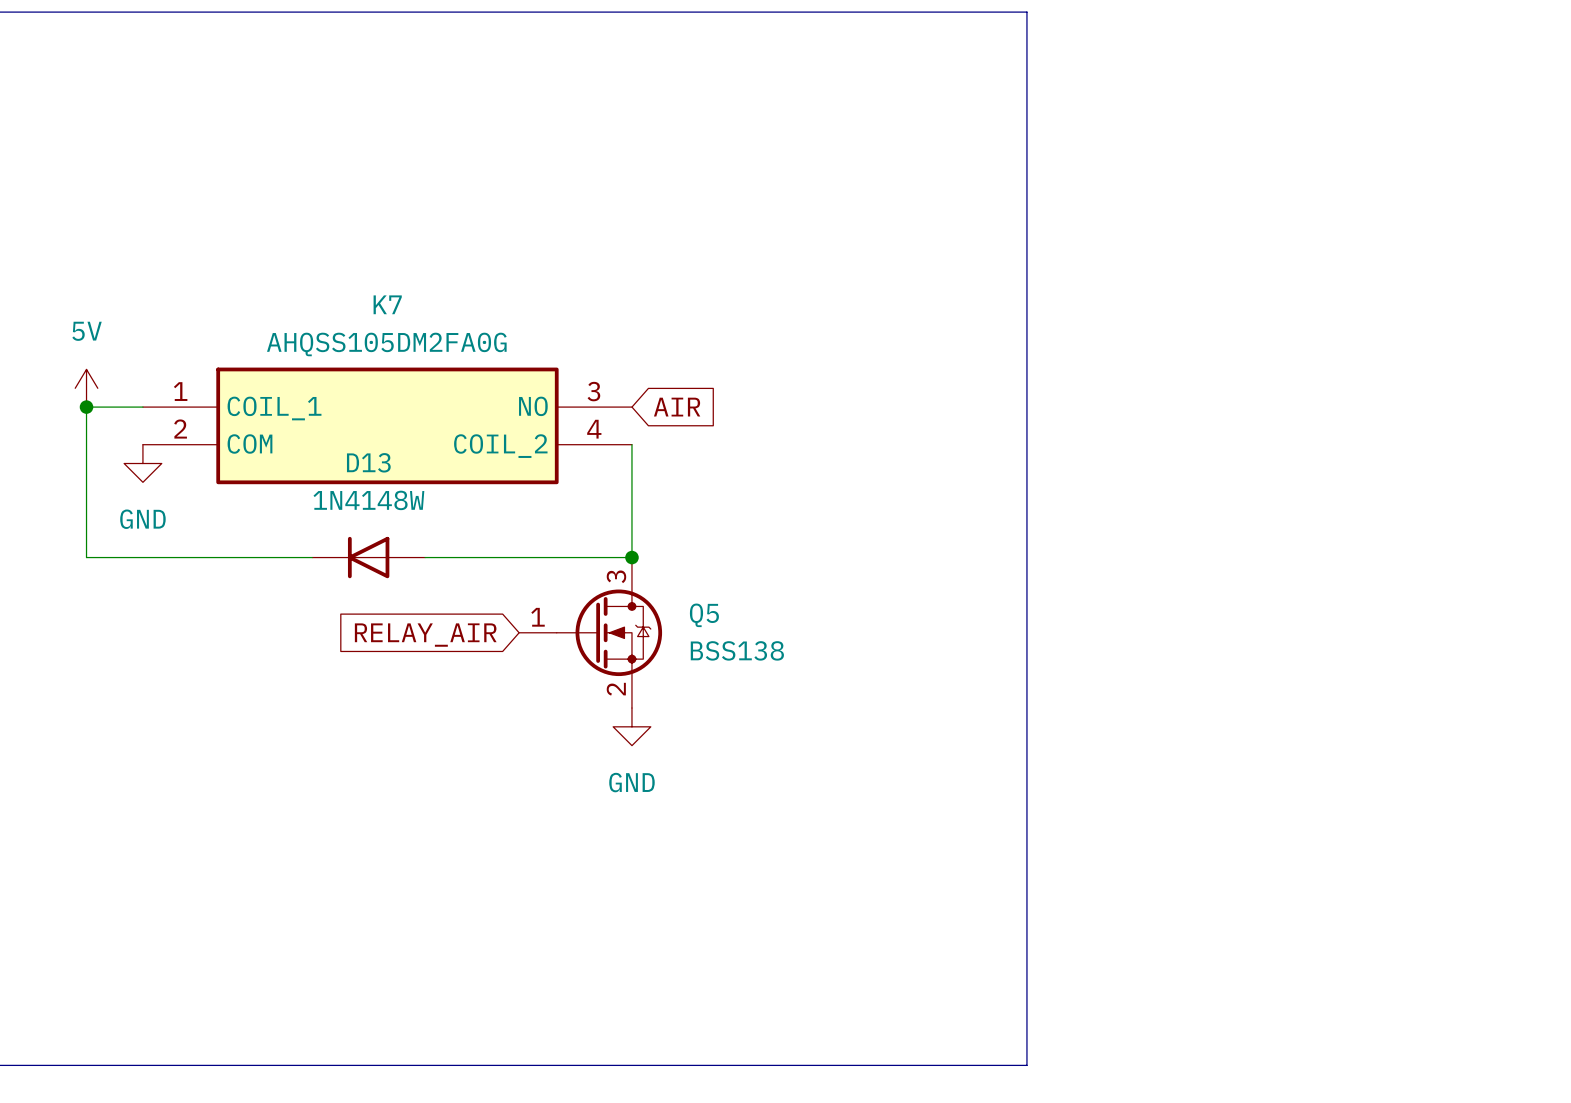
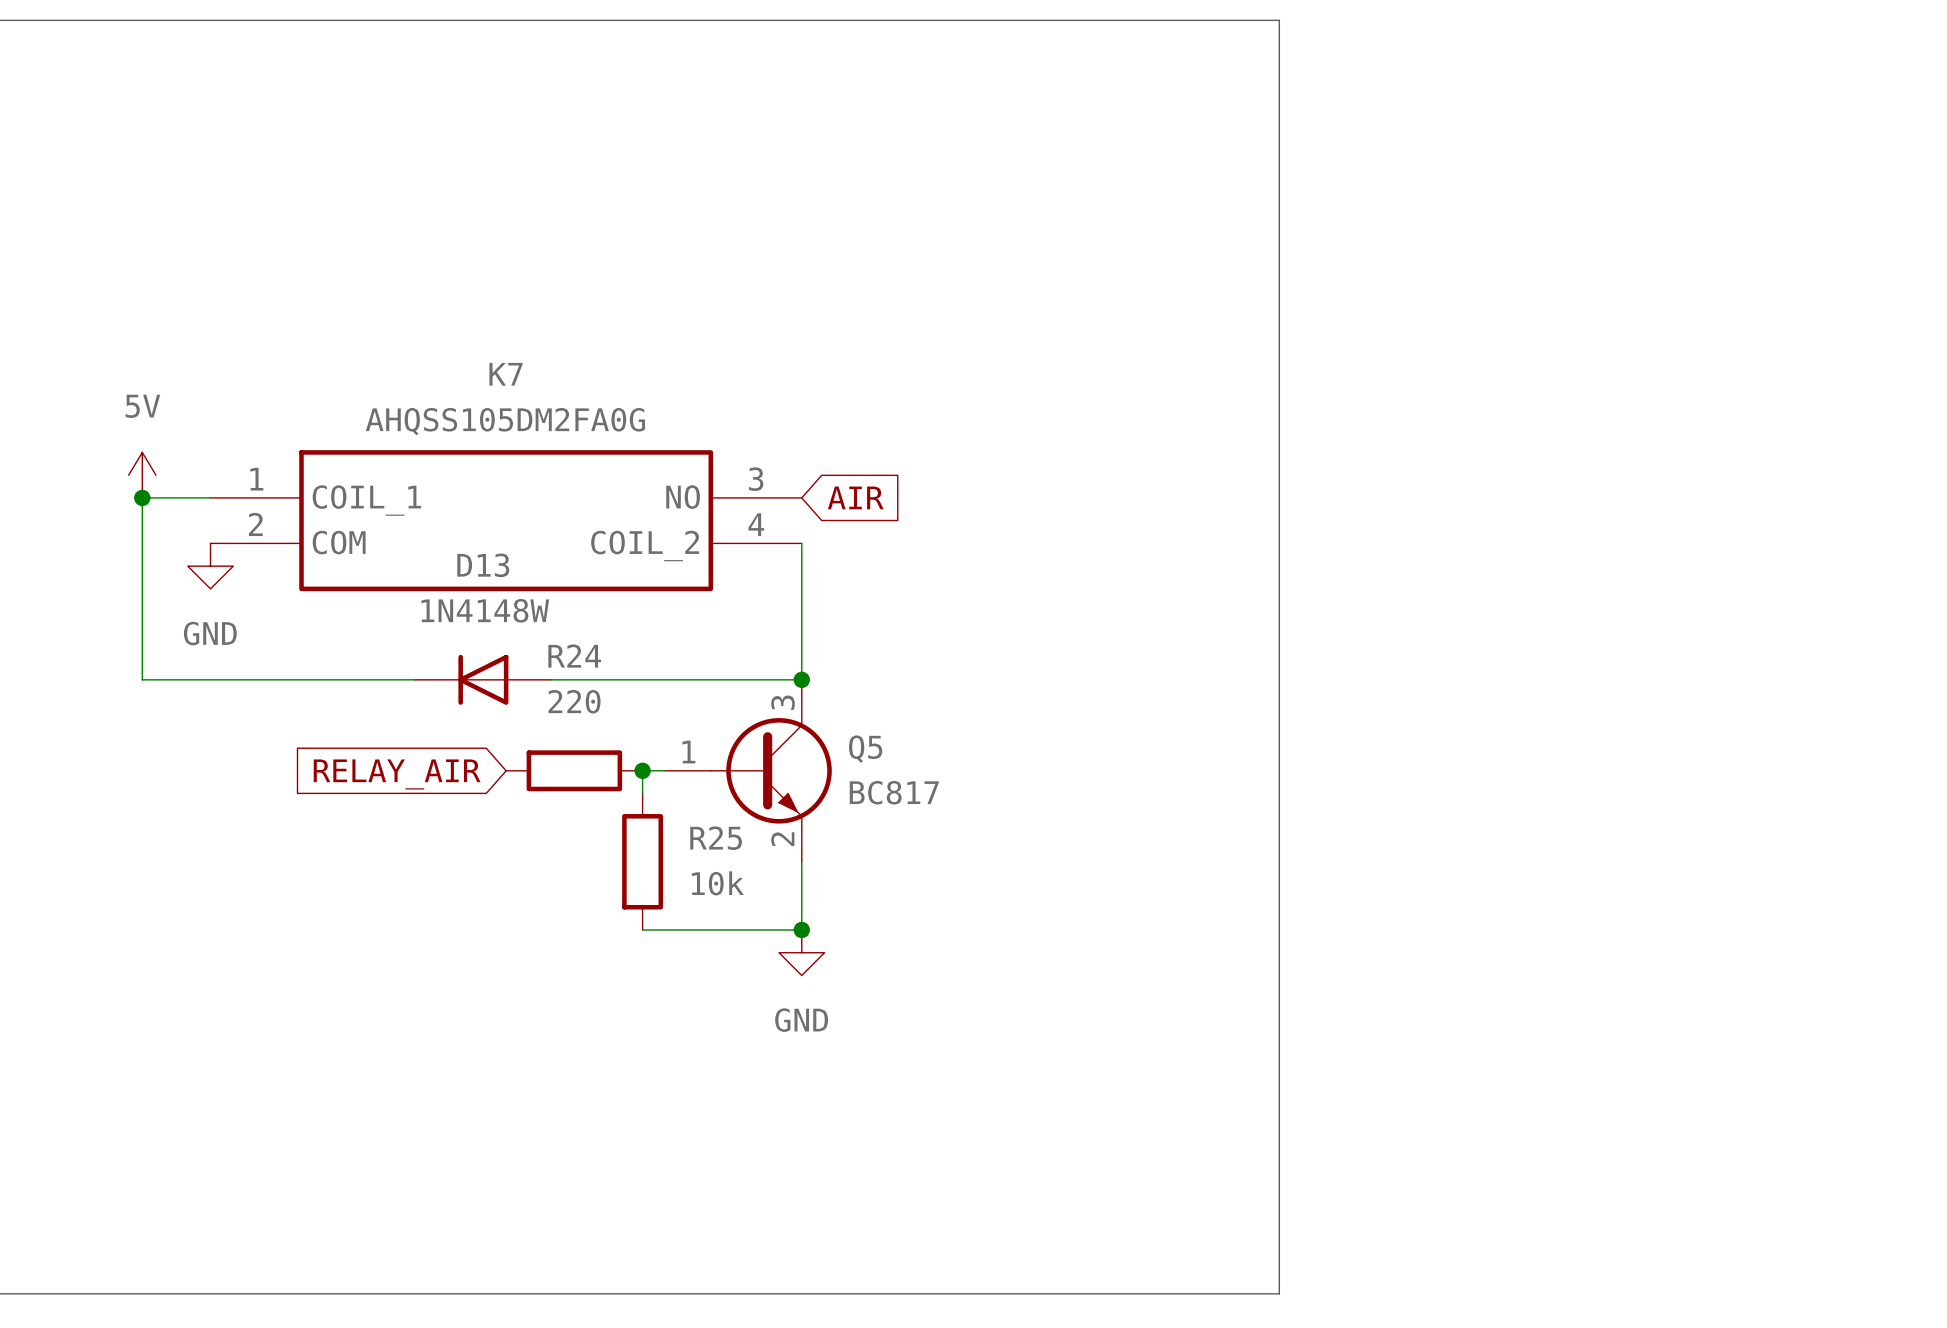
Q5 symbol: [519, 557, 663, 709] -> [665, 679, 832, 862]
R24: none -> 220 (574, 770)
junction: none -> (642, 770)
wire: none -> (665, 770) (642, 770) (642, 793)
global label position: RELAY_AIR (425, 635) -> RELAY_AIR (397, 774)
Q5 value: BSS138 (737, 650) -> BC817 (894, 792)
R25: none -> 10k (642, 861)
wire: none -> (801, 861) (801, 929) (642, 929)
power symbol position: GND (631, 726) -> GND (801, 952)
junction: none -> (801, 929)

